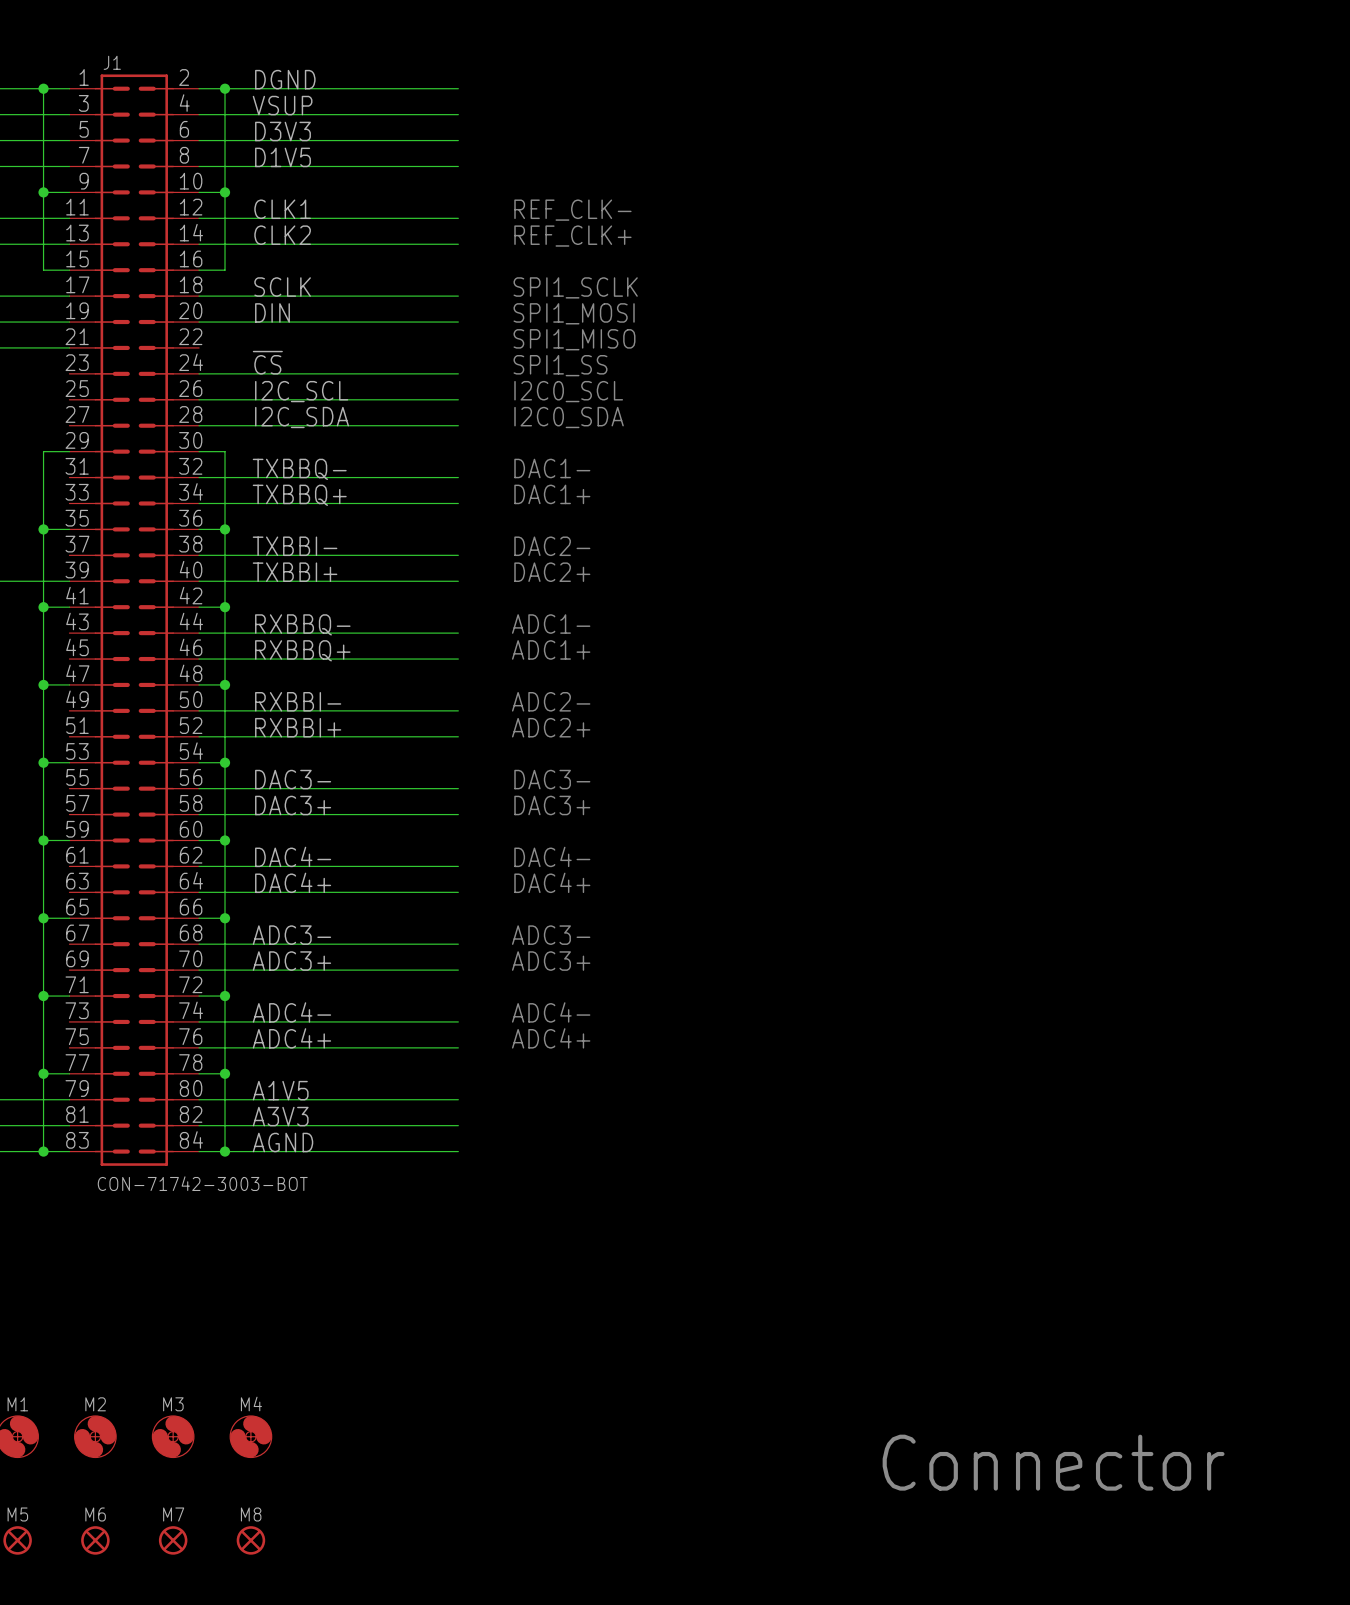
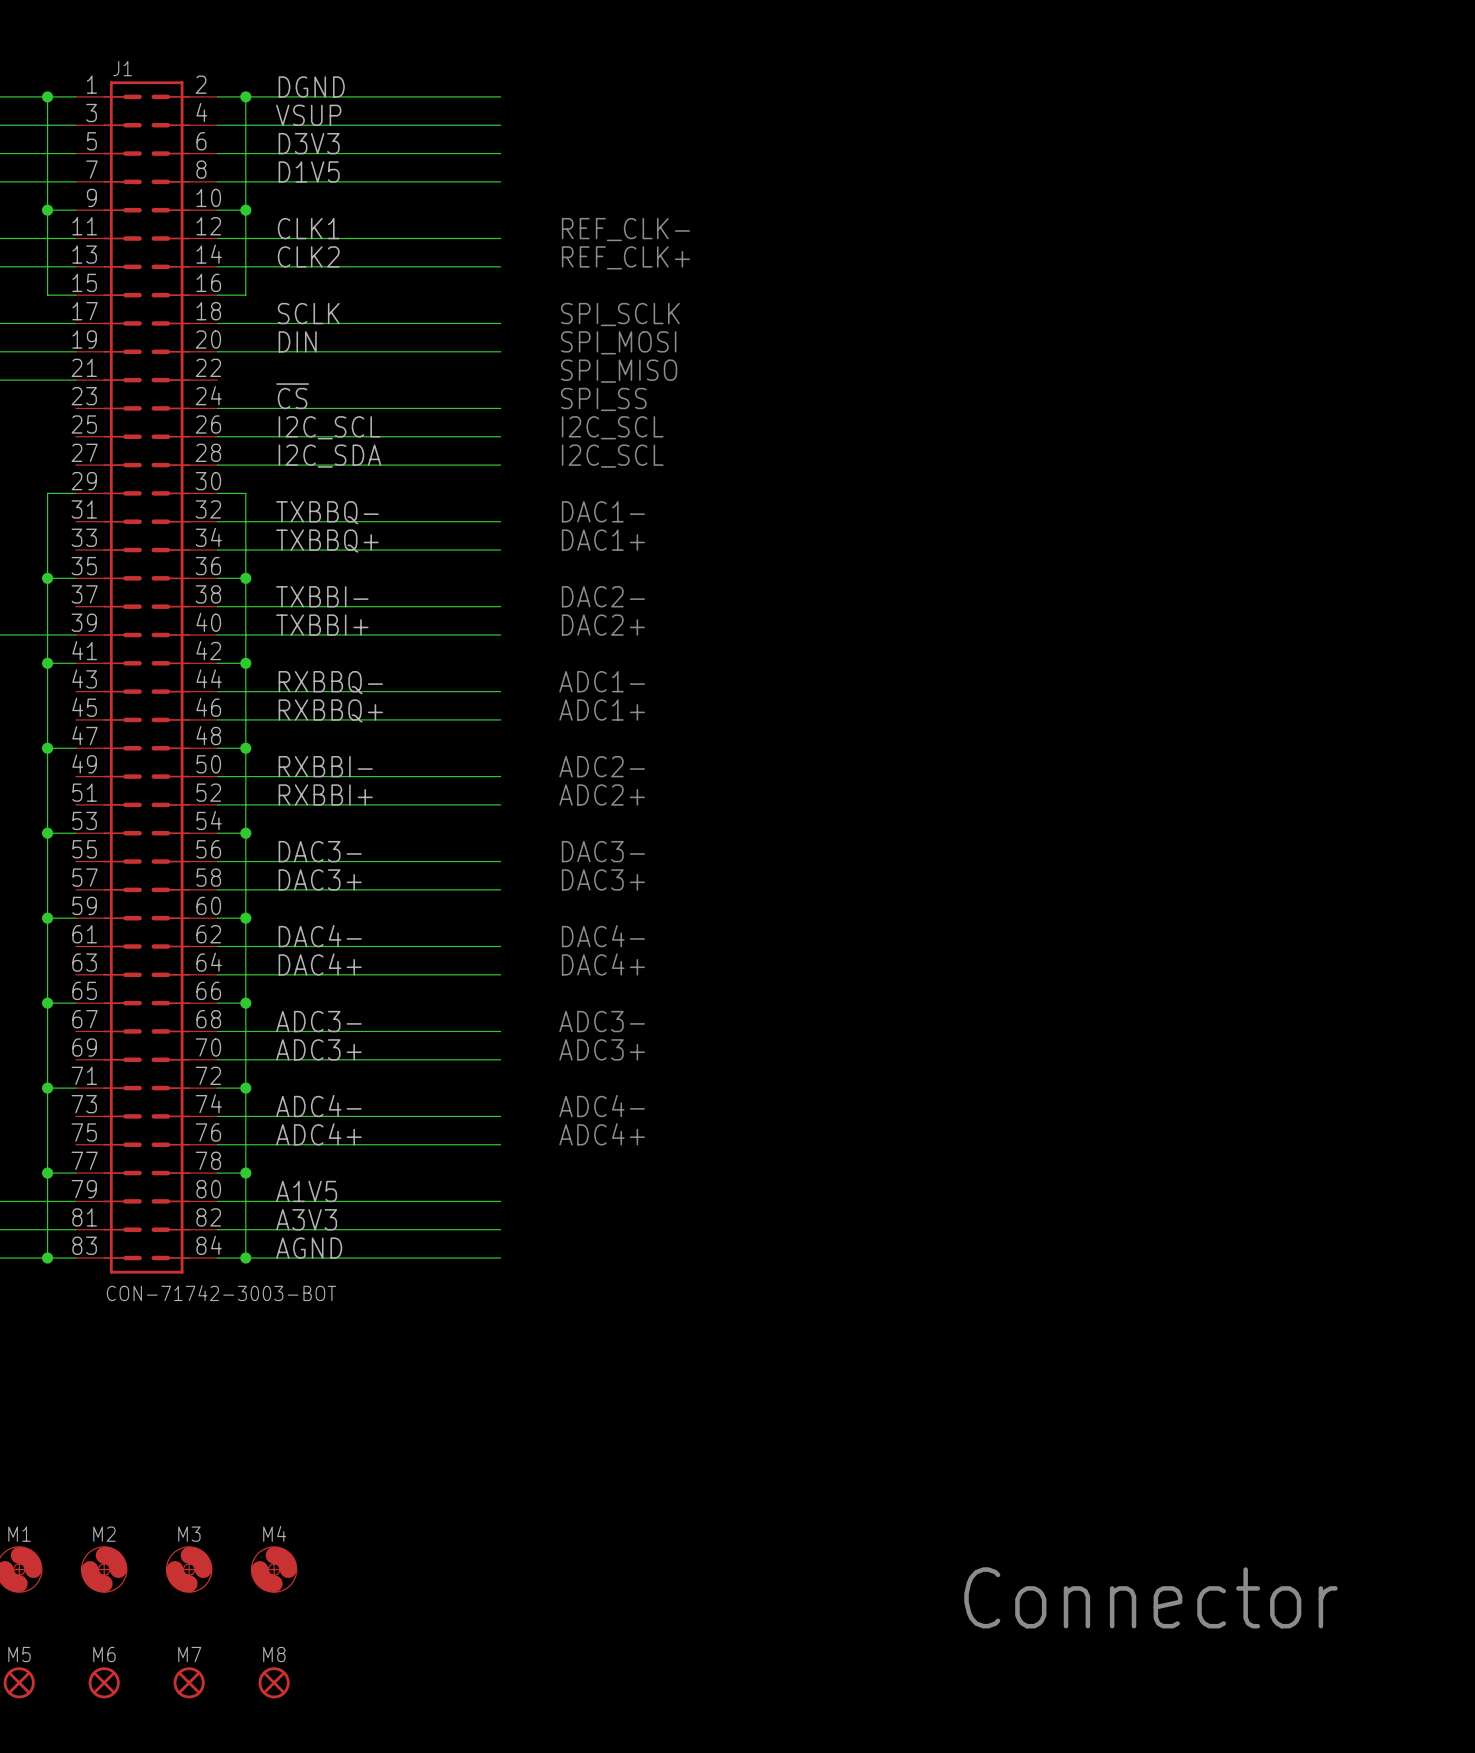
text: SPI1_SCLK (575, 287) -> SPI_SCLK (620, 314)
text: SPI1_MOSI (574, 313) -> SPI_MOSI (618, 342)
text: SPI1_MISO (574, 339) -> SPI_MISO (619, 371)
text: SPI1_SS (560, 365) -> SPI_SS (603, 399)
text: I2C0_SCL (568, 391) -> I2C_SCL (612, 427)
text: I2C0_SDA (569, 417) -> I2C_SCL (612, 456)

